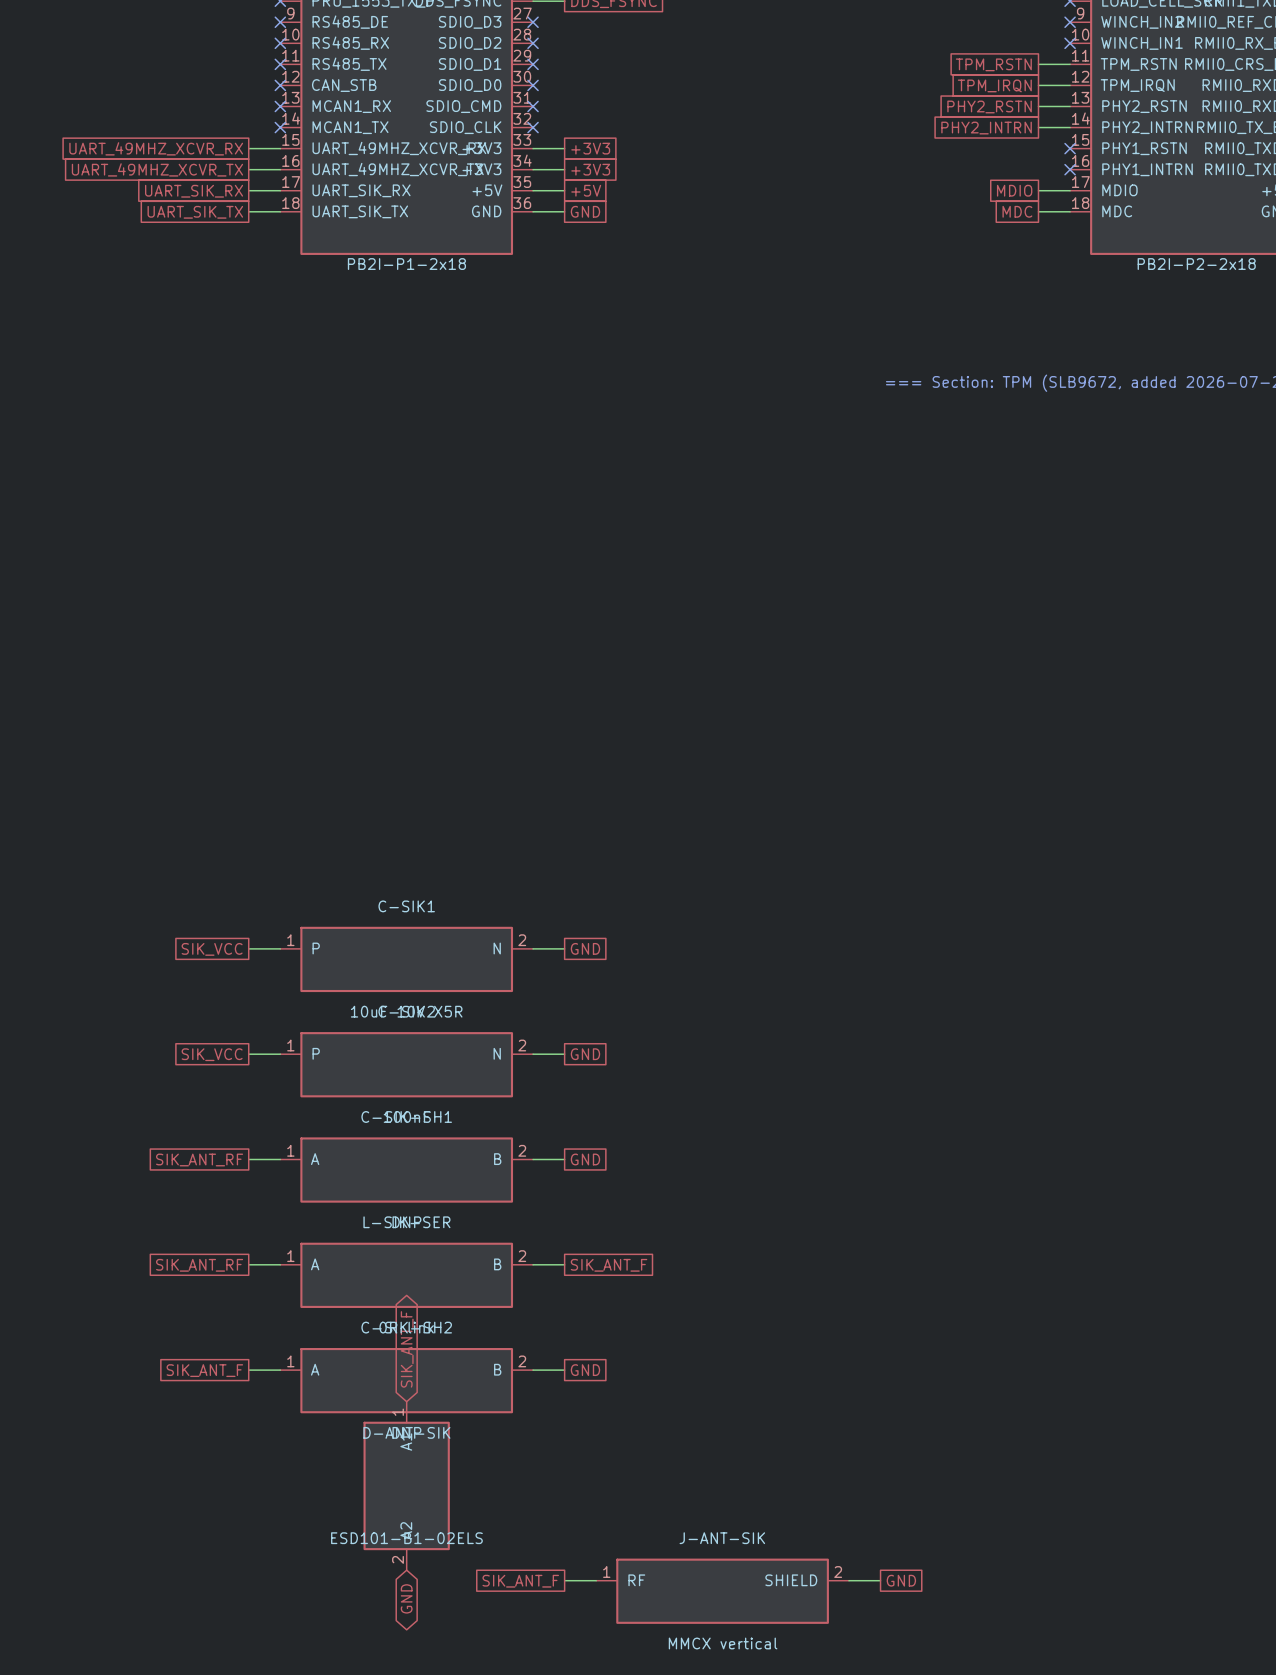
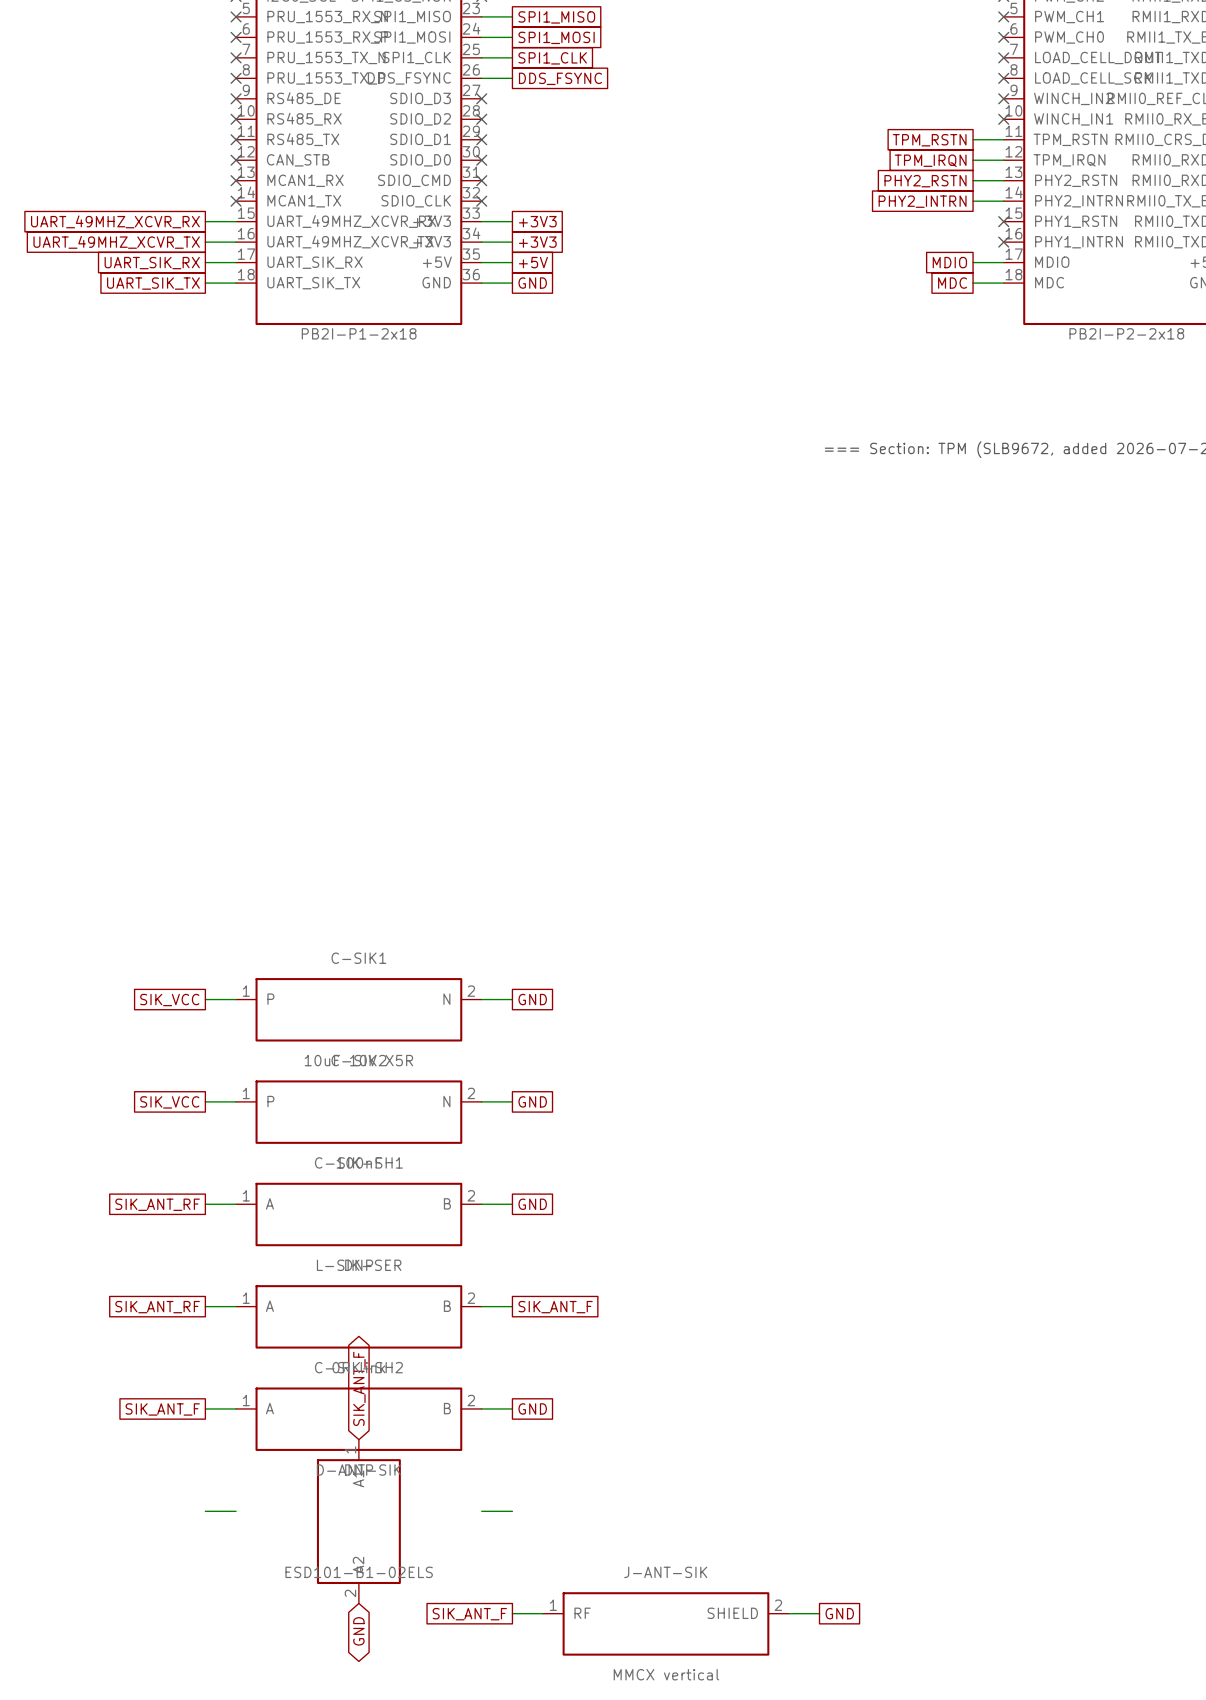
wire: none -> (205, 1511) (236, 1511)
wire: none -> (481, 1511) (512, 1511)

